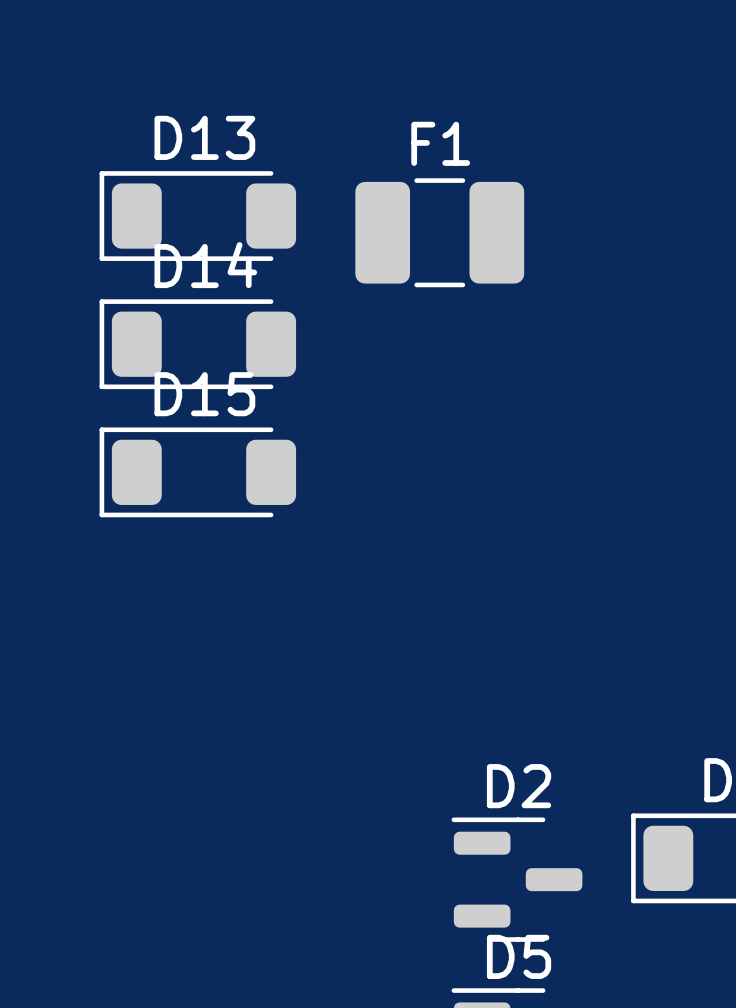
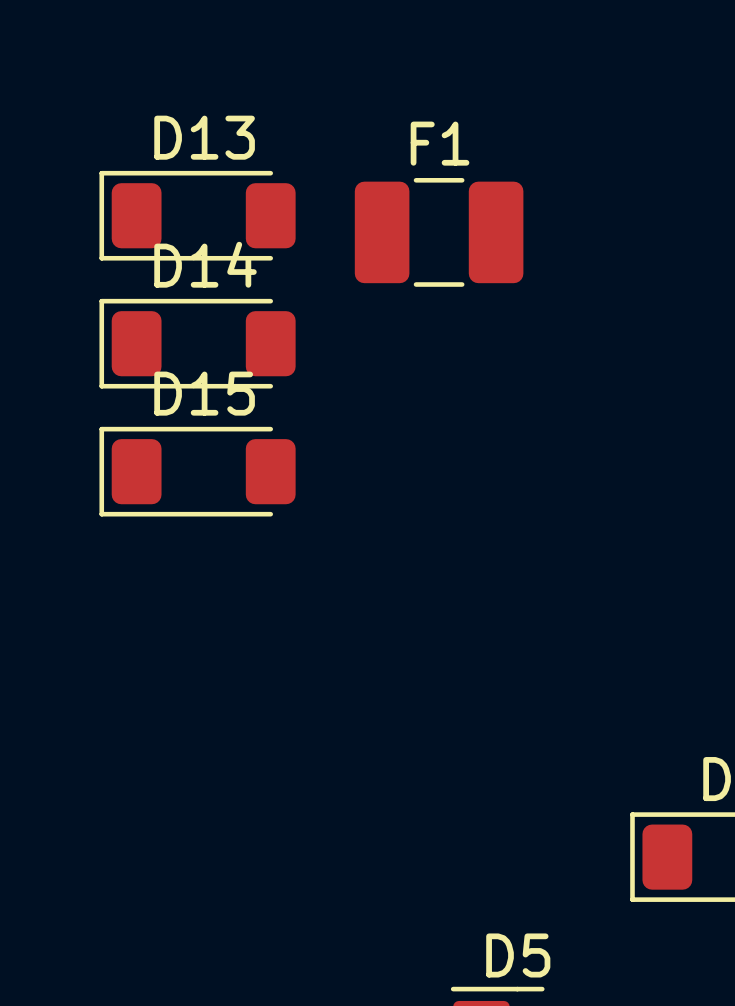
D2: (516, 879) -> none

